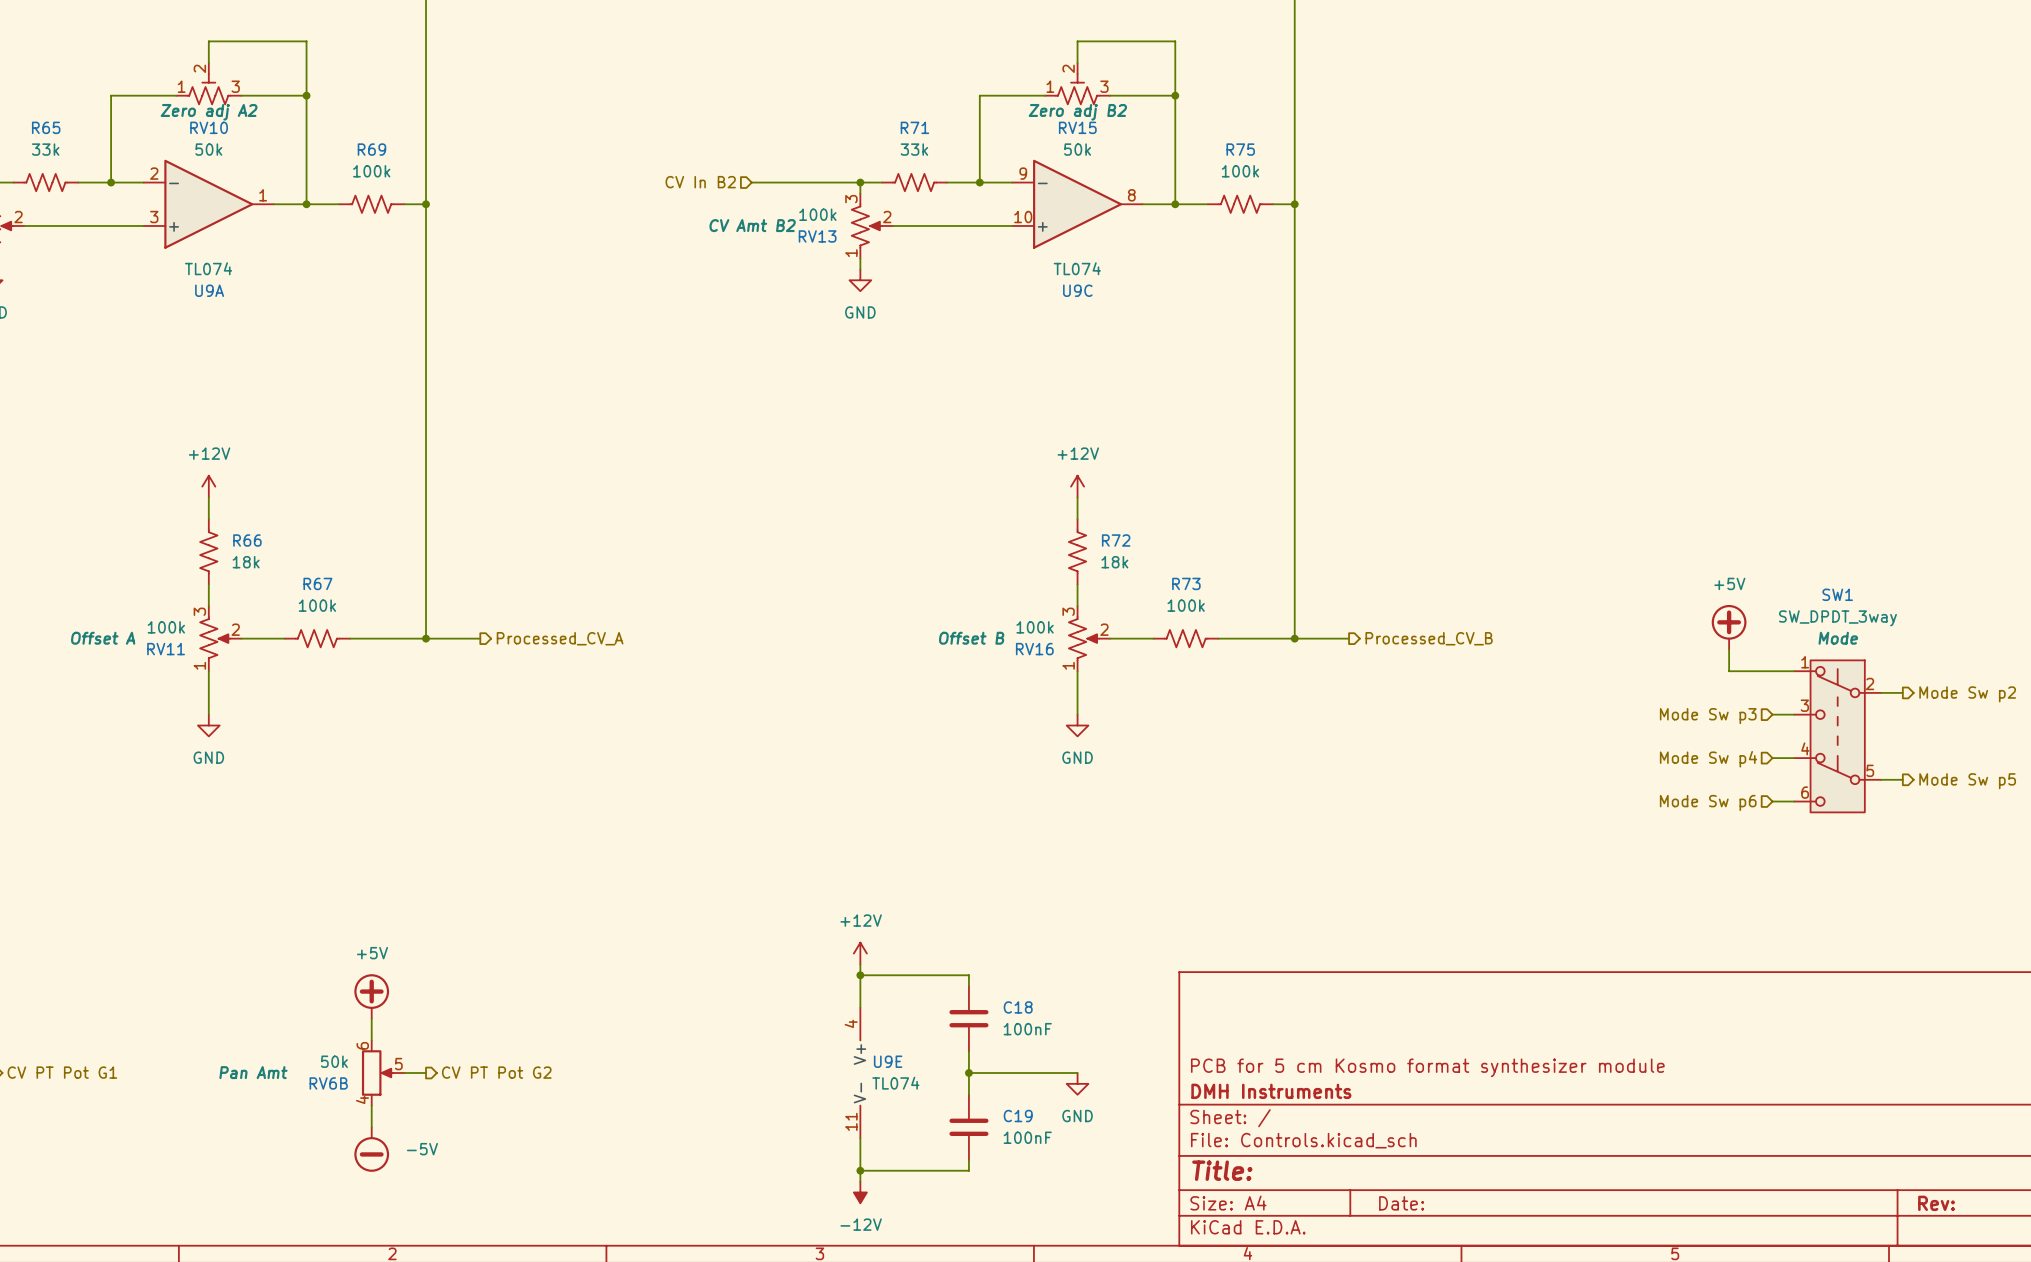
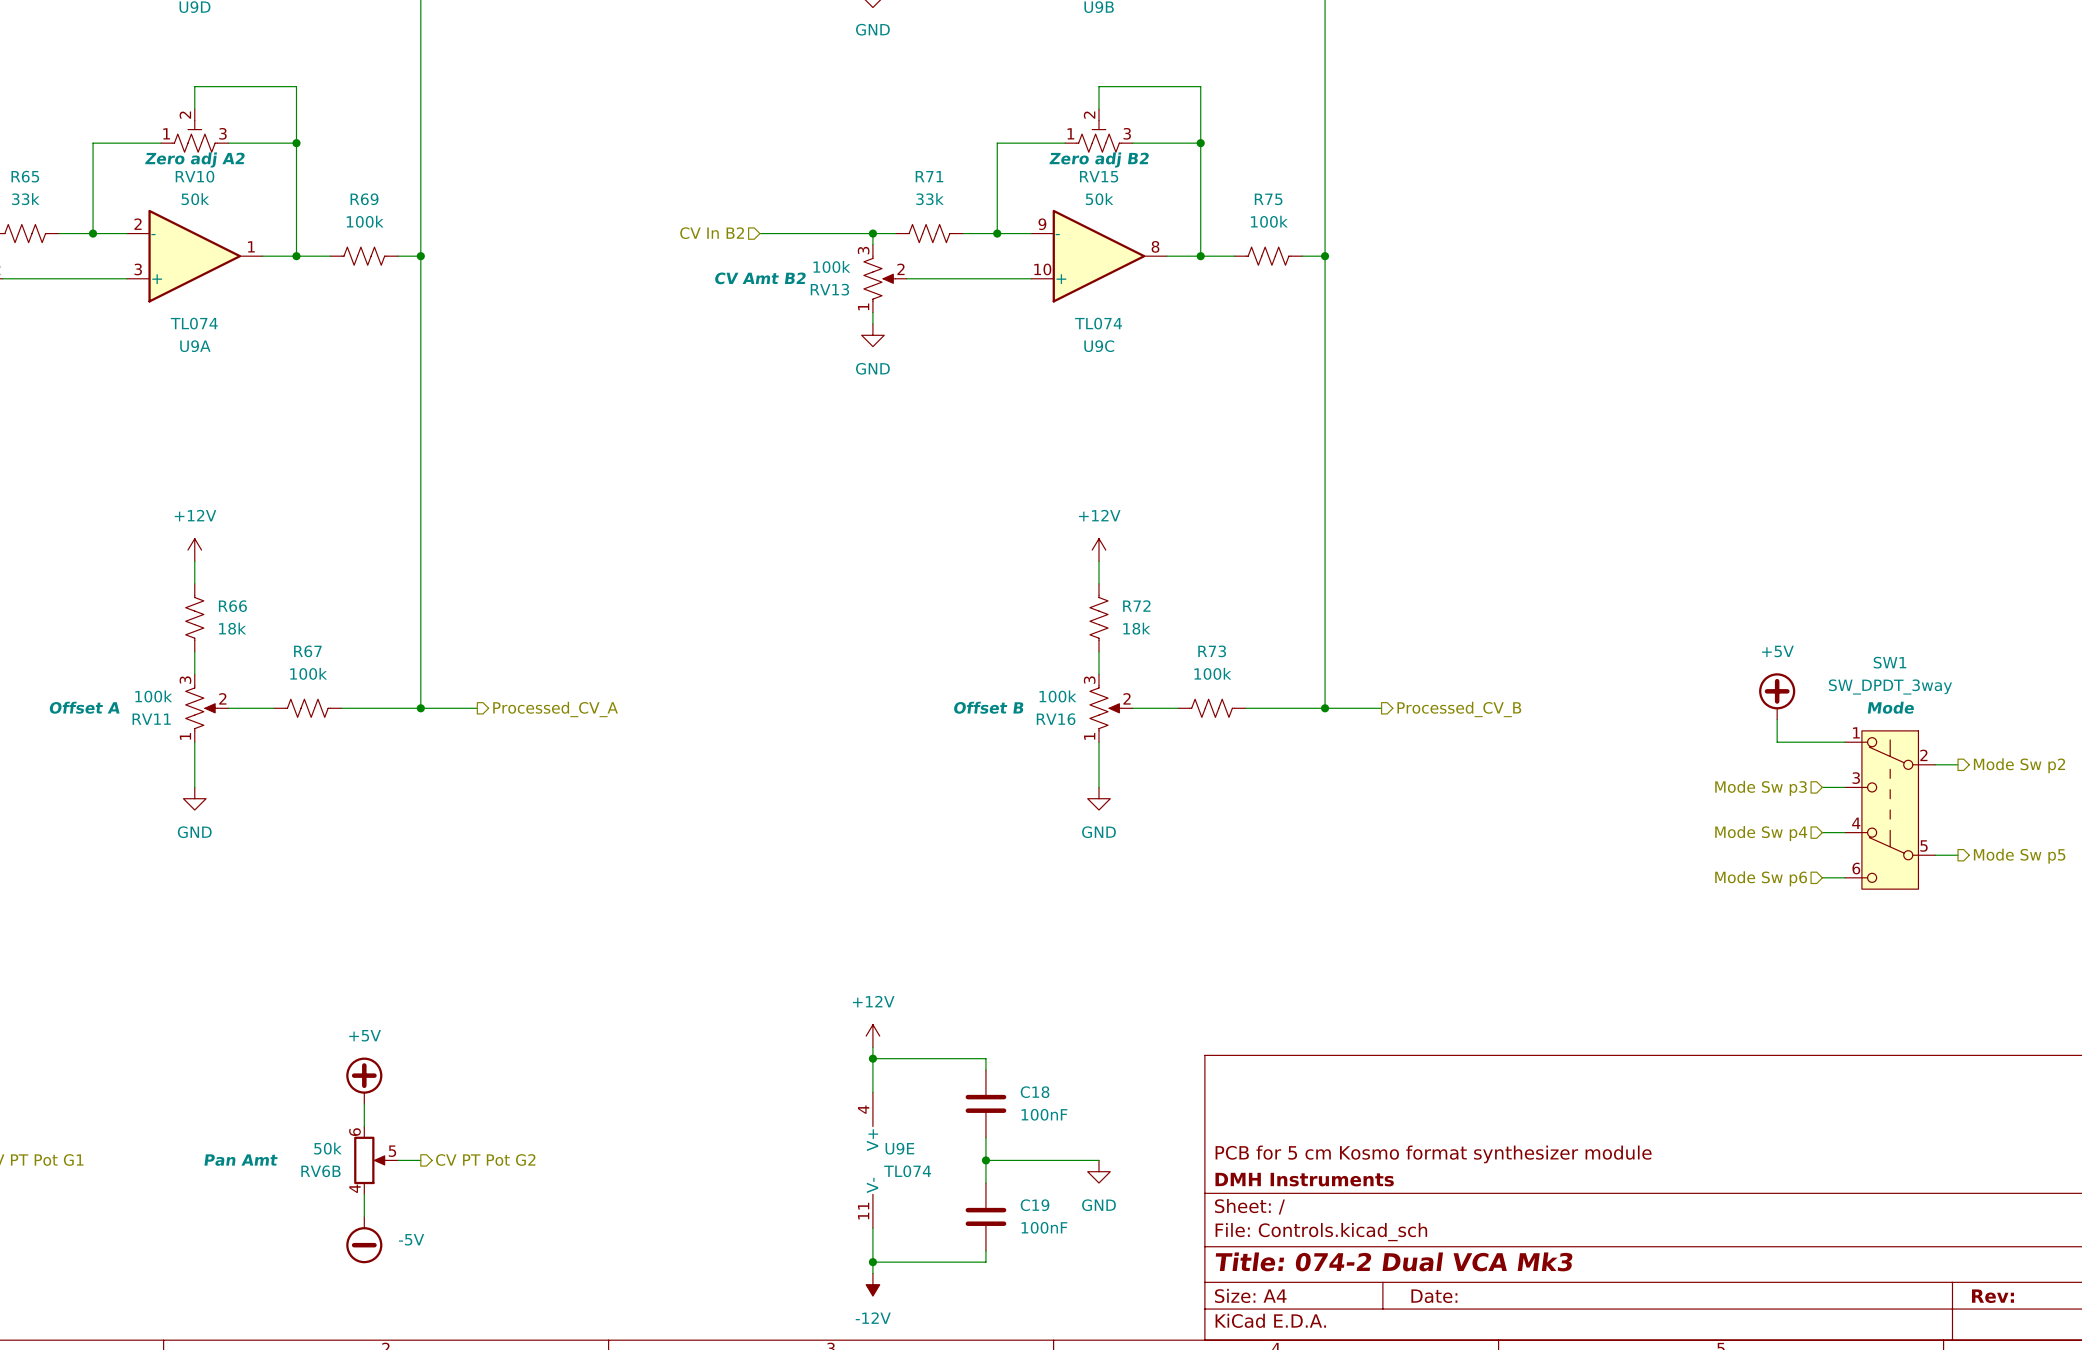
title block: Title: (1222, 1170) -> Title: 074-2 Dual VCA Mk3 (1394, 1261)

